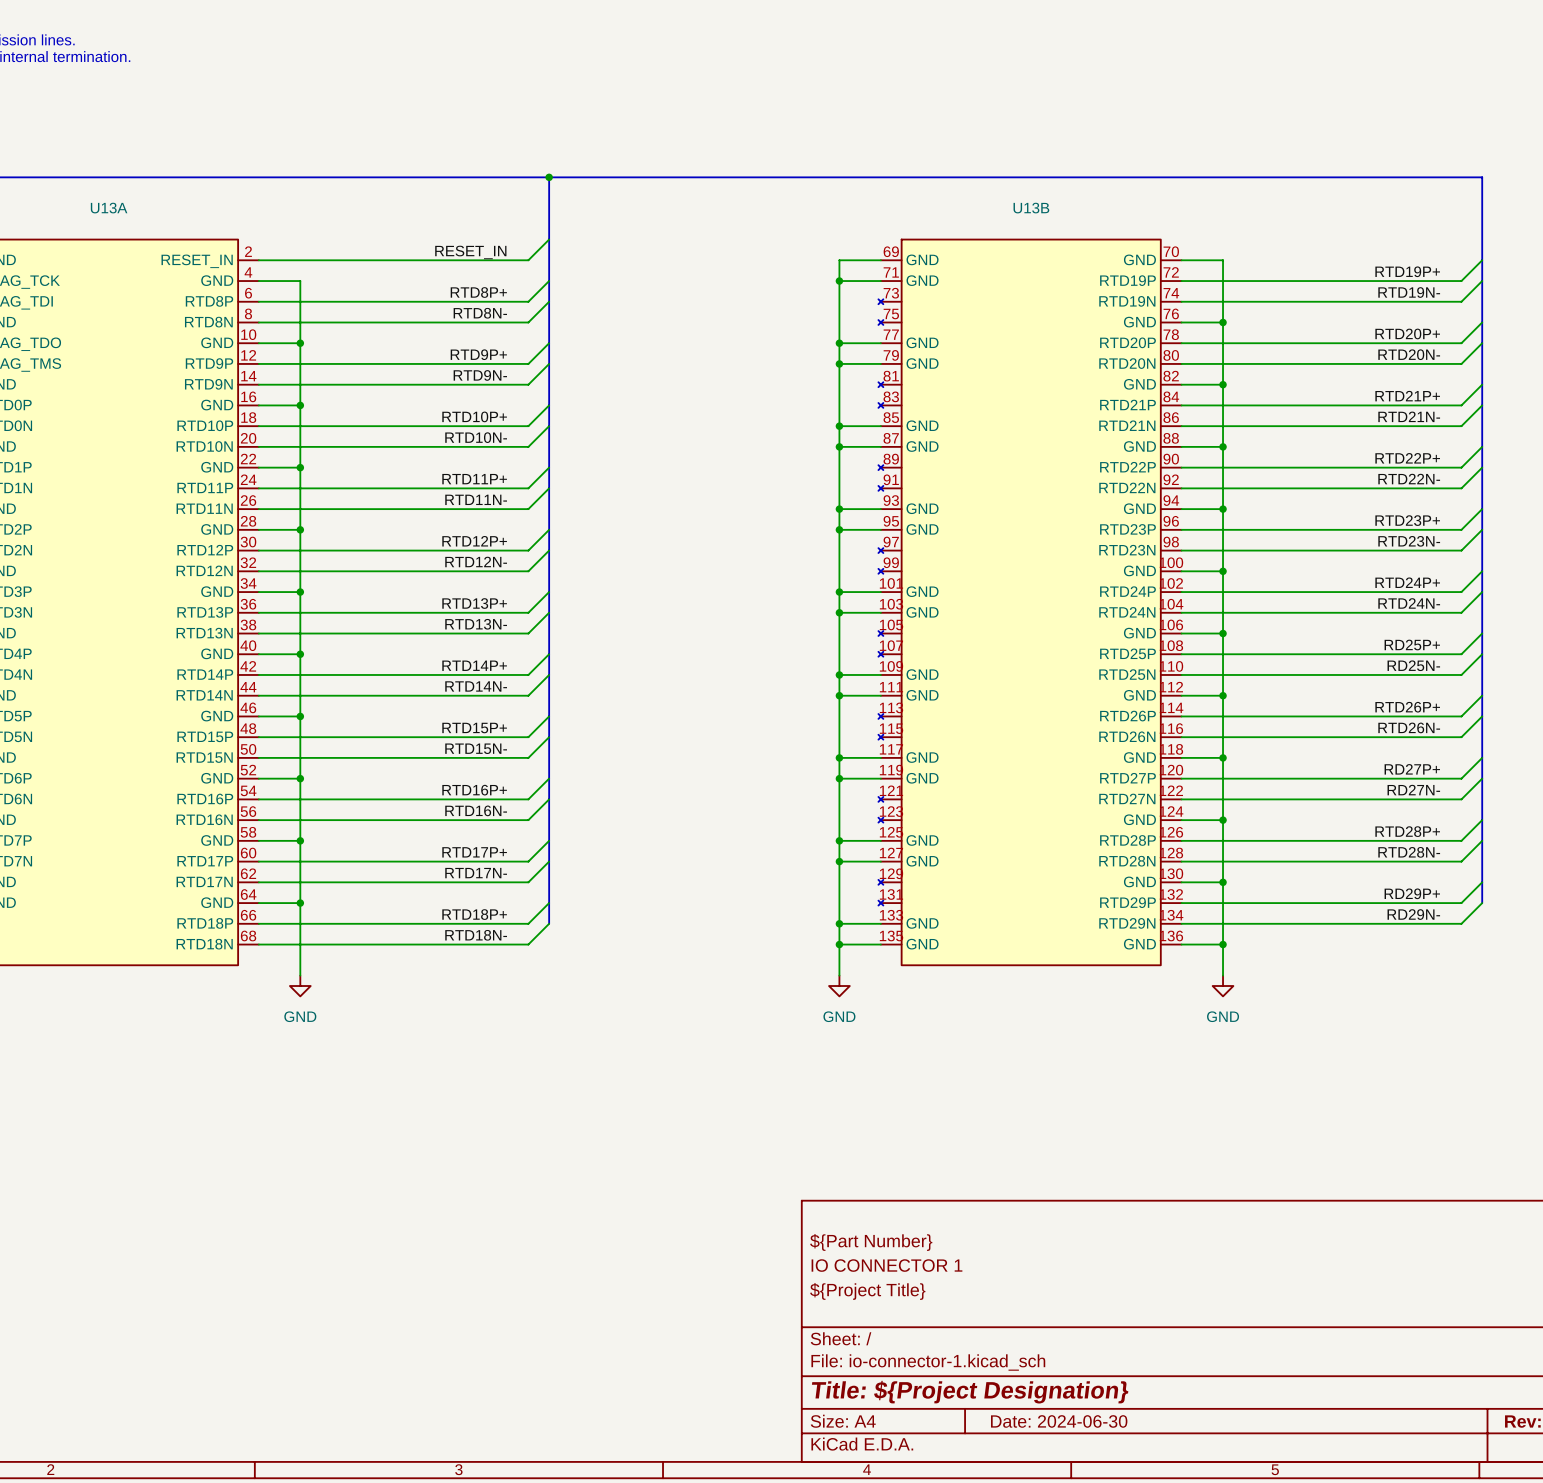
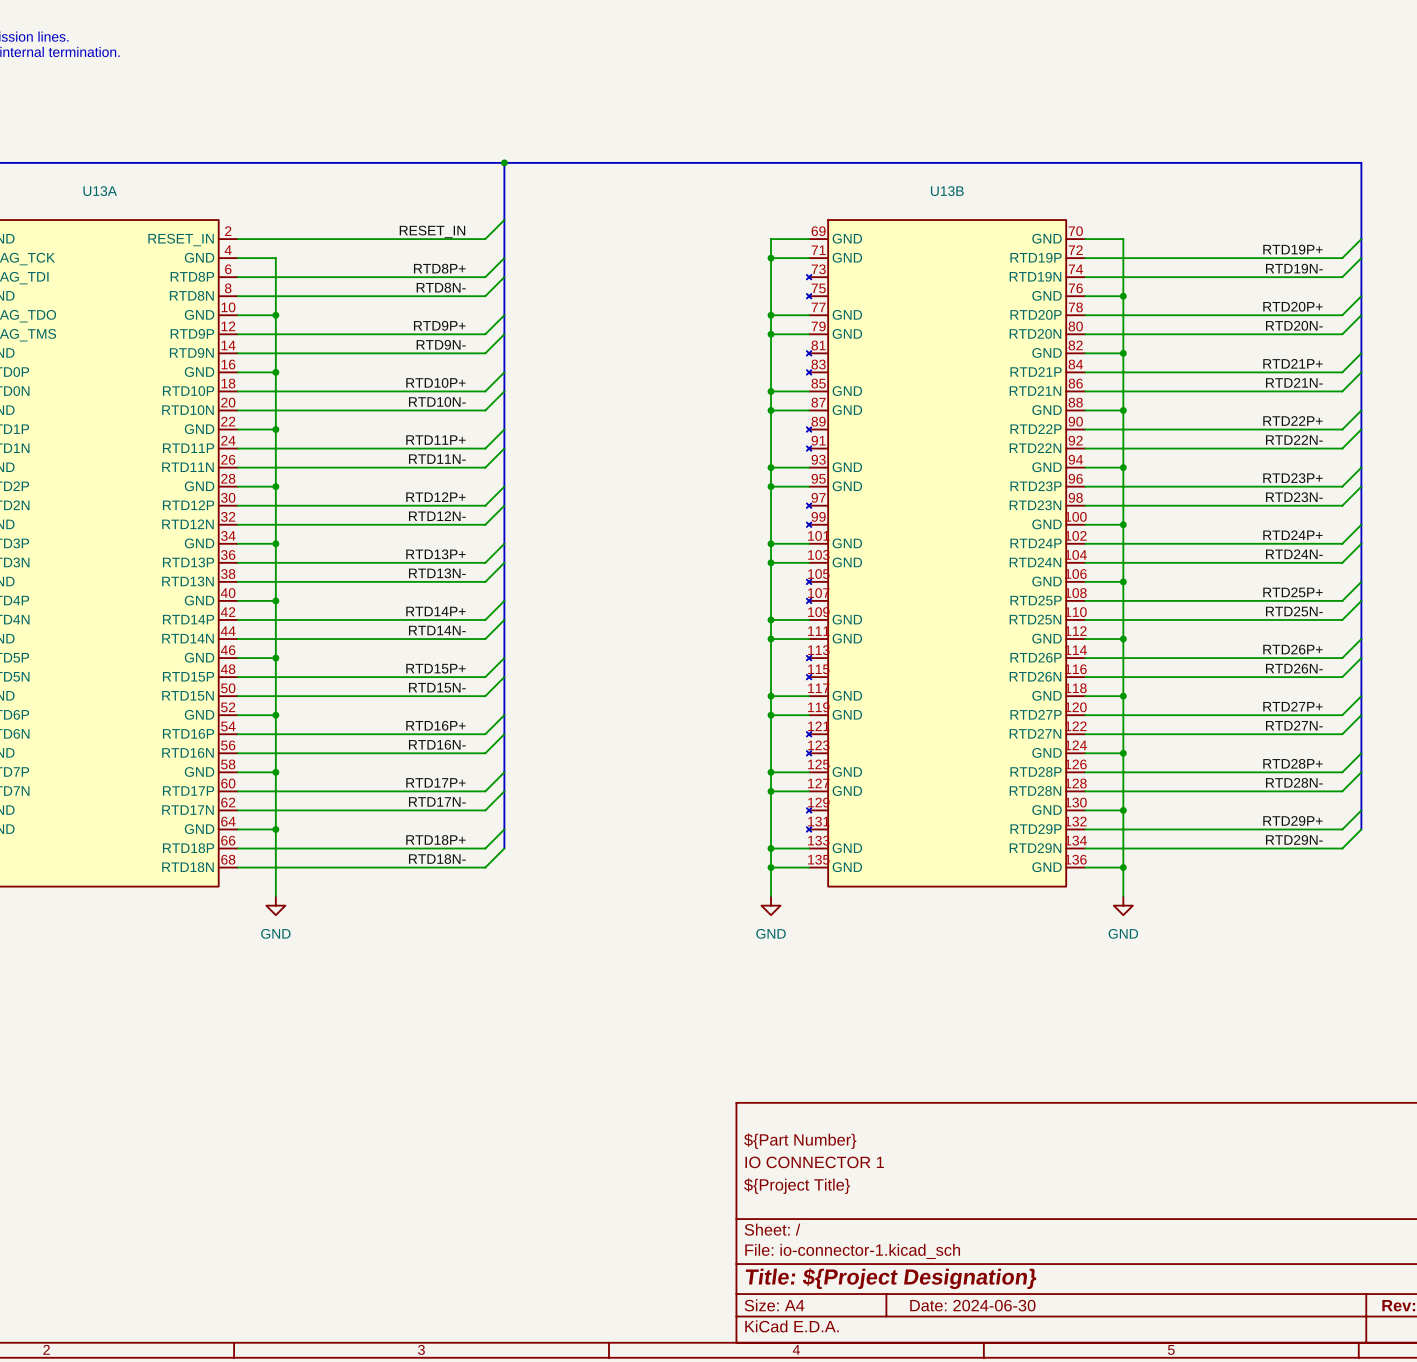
label: RD25P+ (1412, 644) -> RTD25P+ (1292, 592)
label: RD25N- (1413, 665) -> RTD25N- (1294, 611)
label: RD27P+ (1412, 769) -> RTD27P+ (1292, 706)
label: RD27N- (1413, 790) -> RTD27N- (1294, 725)
label: RD29P+ (1412, 893) -> RTD29P+ (1292, 820)
label: RD29N- (1413, 914) -> RTD29N- (1294, 840)

